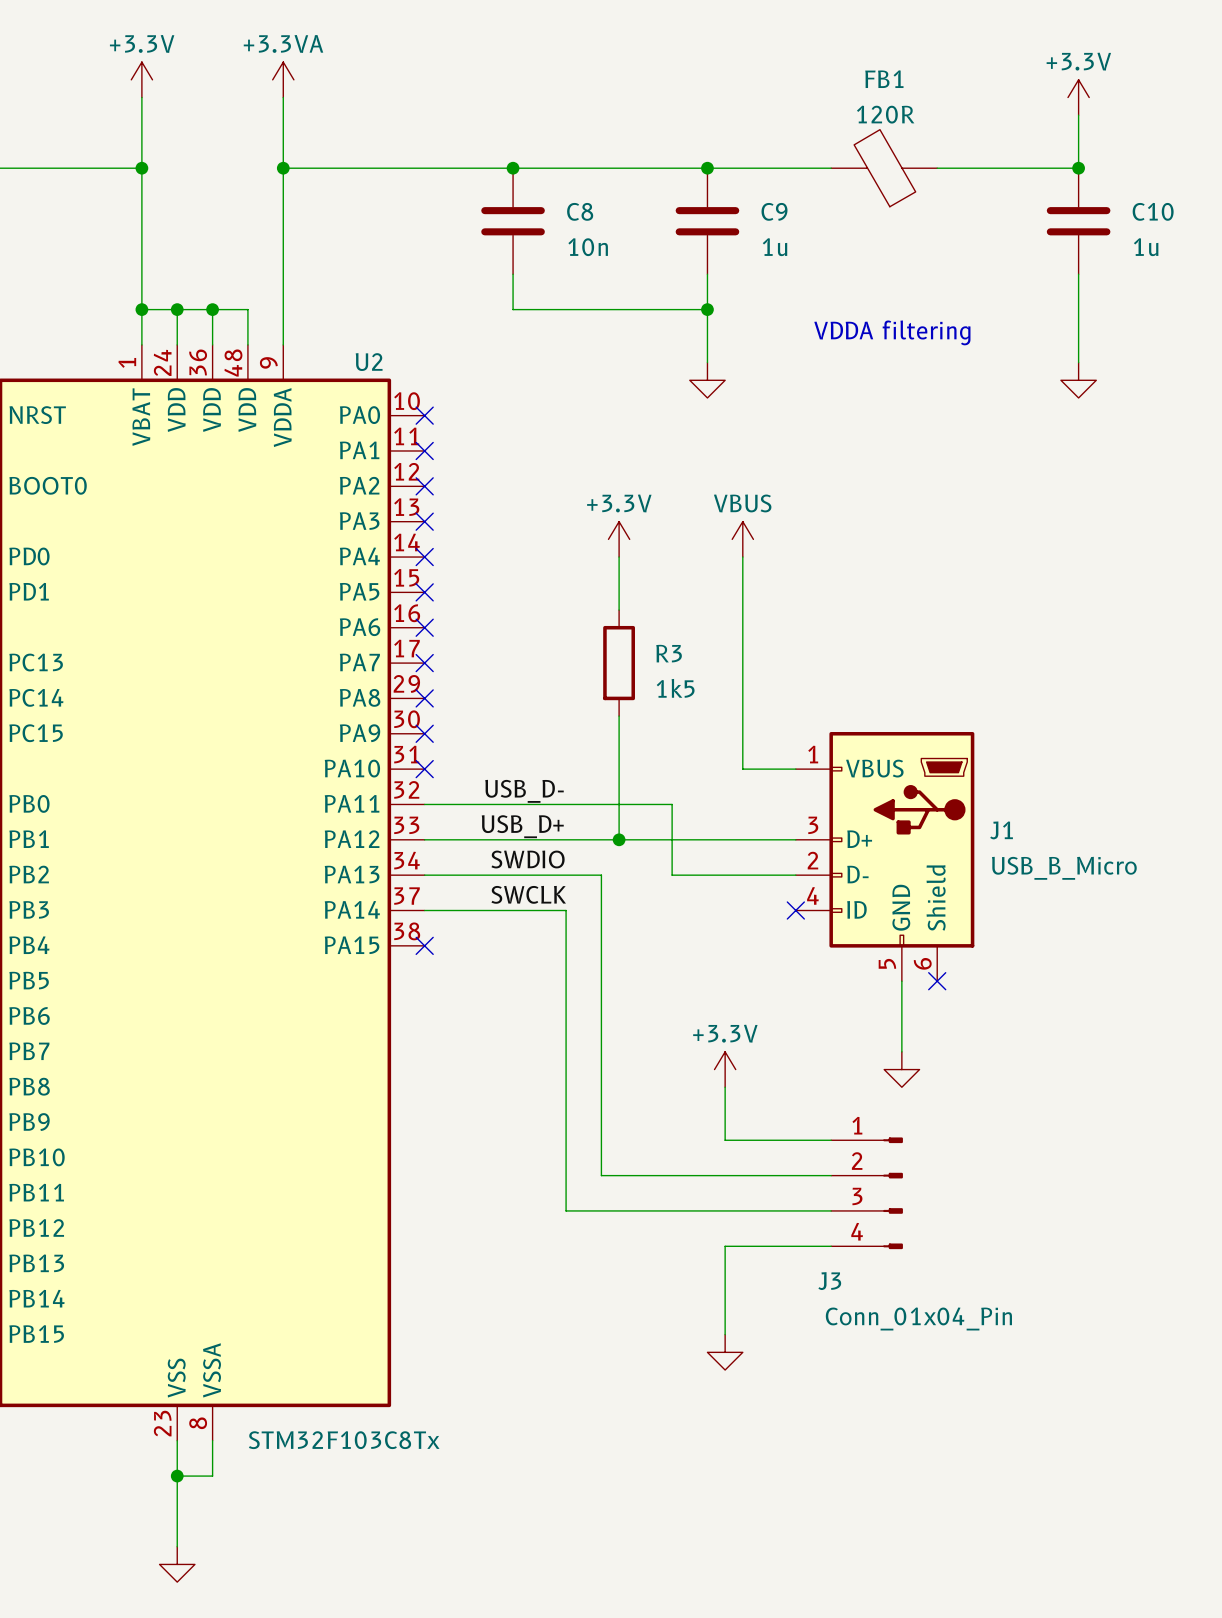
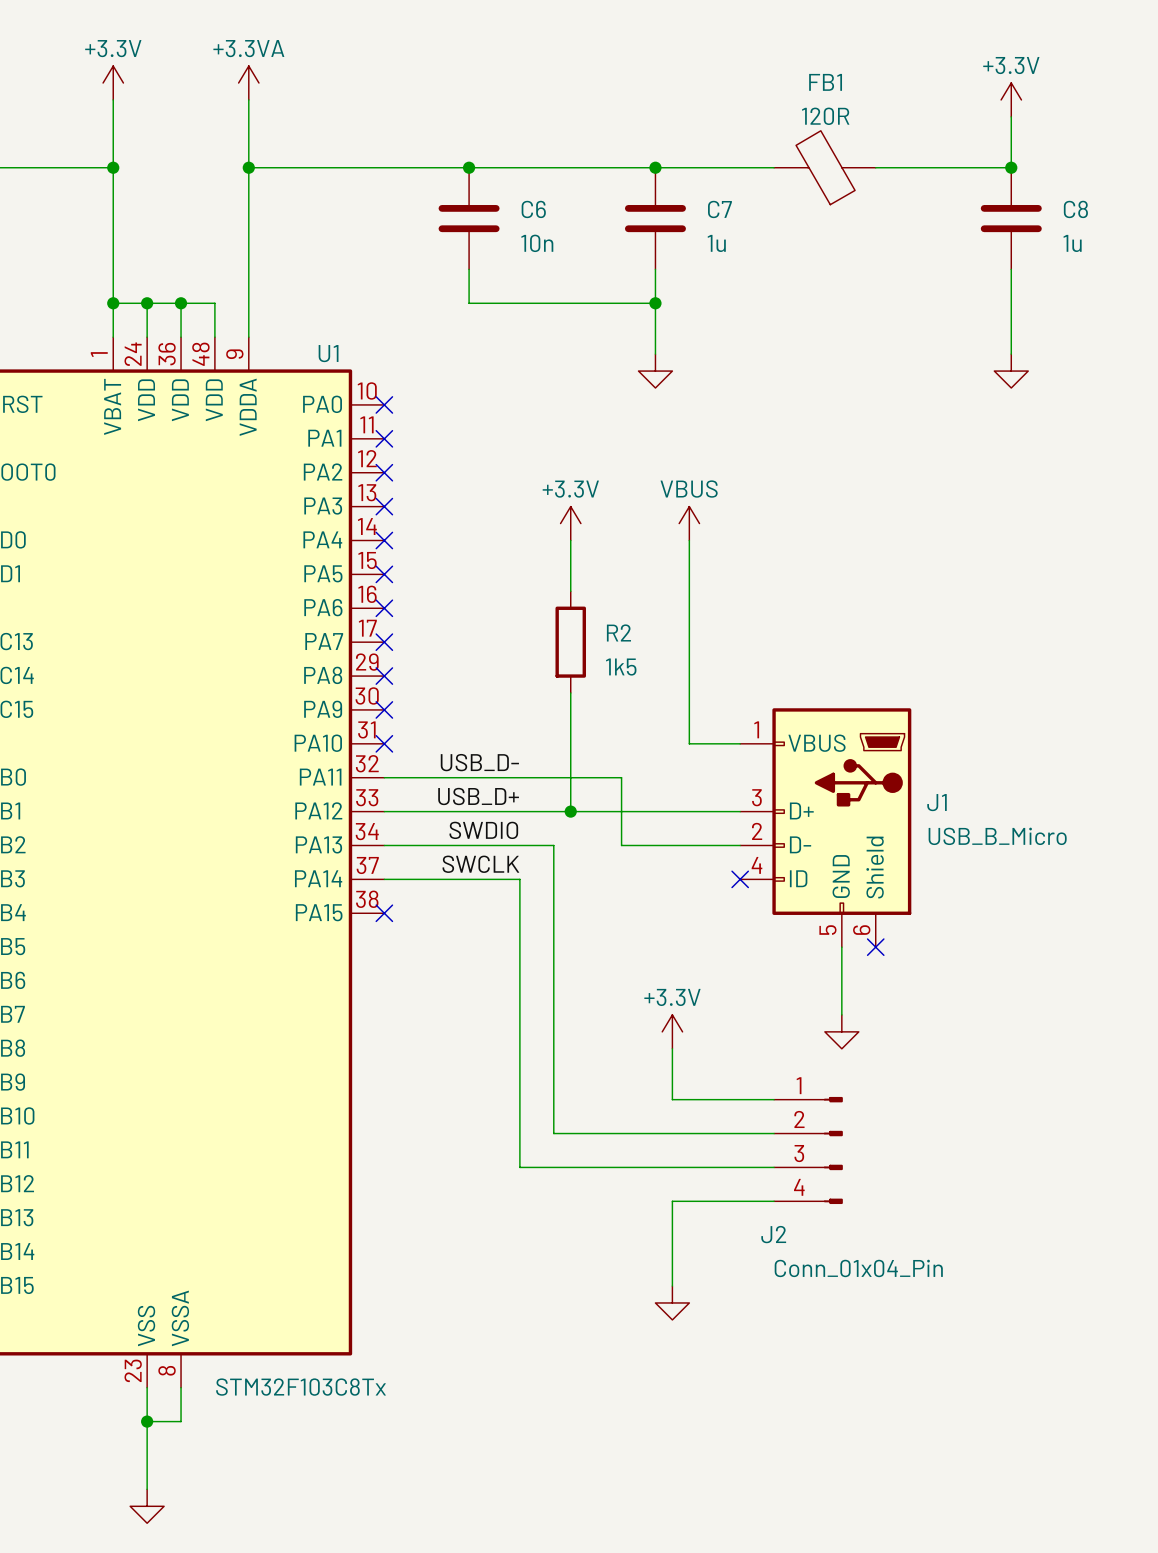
C8 name: C8 (580, 211) -> C6 (533, 209)
C9 name: C9 (774, 211) -> C7 (719, 209)
C10 name: C10 (1153, 211) -> C8 (1075, 209)
text: VDDA filtering (892, 332) -> none
U2 name: U2 (369, 362) -> U1 (328, 353)
R3 name: R3 (669, 653) -> R2 (618, 632)
J3 name: J3 (829, 1281) -> J2 (773, 1234)

